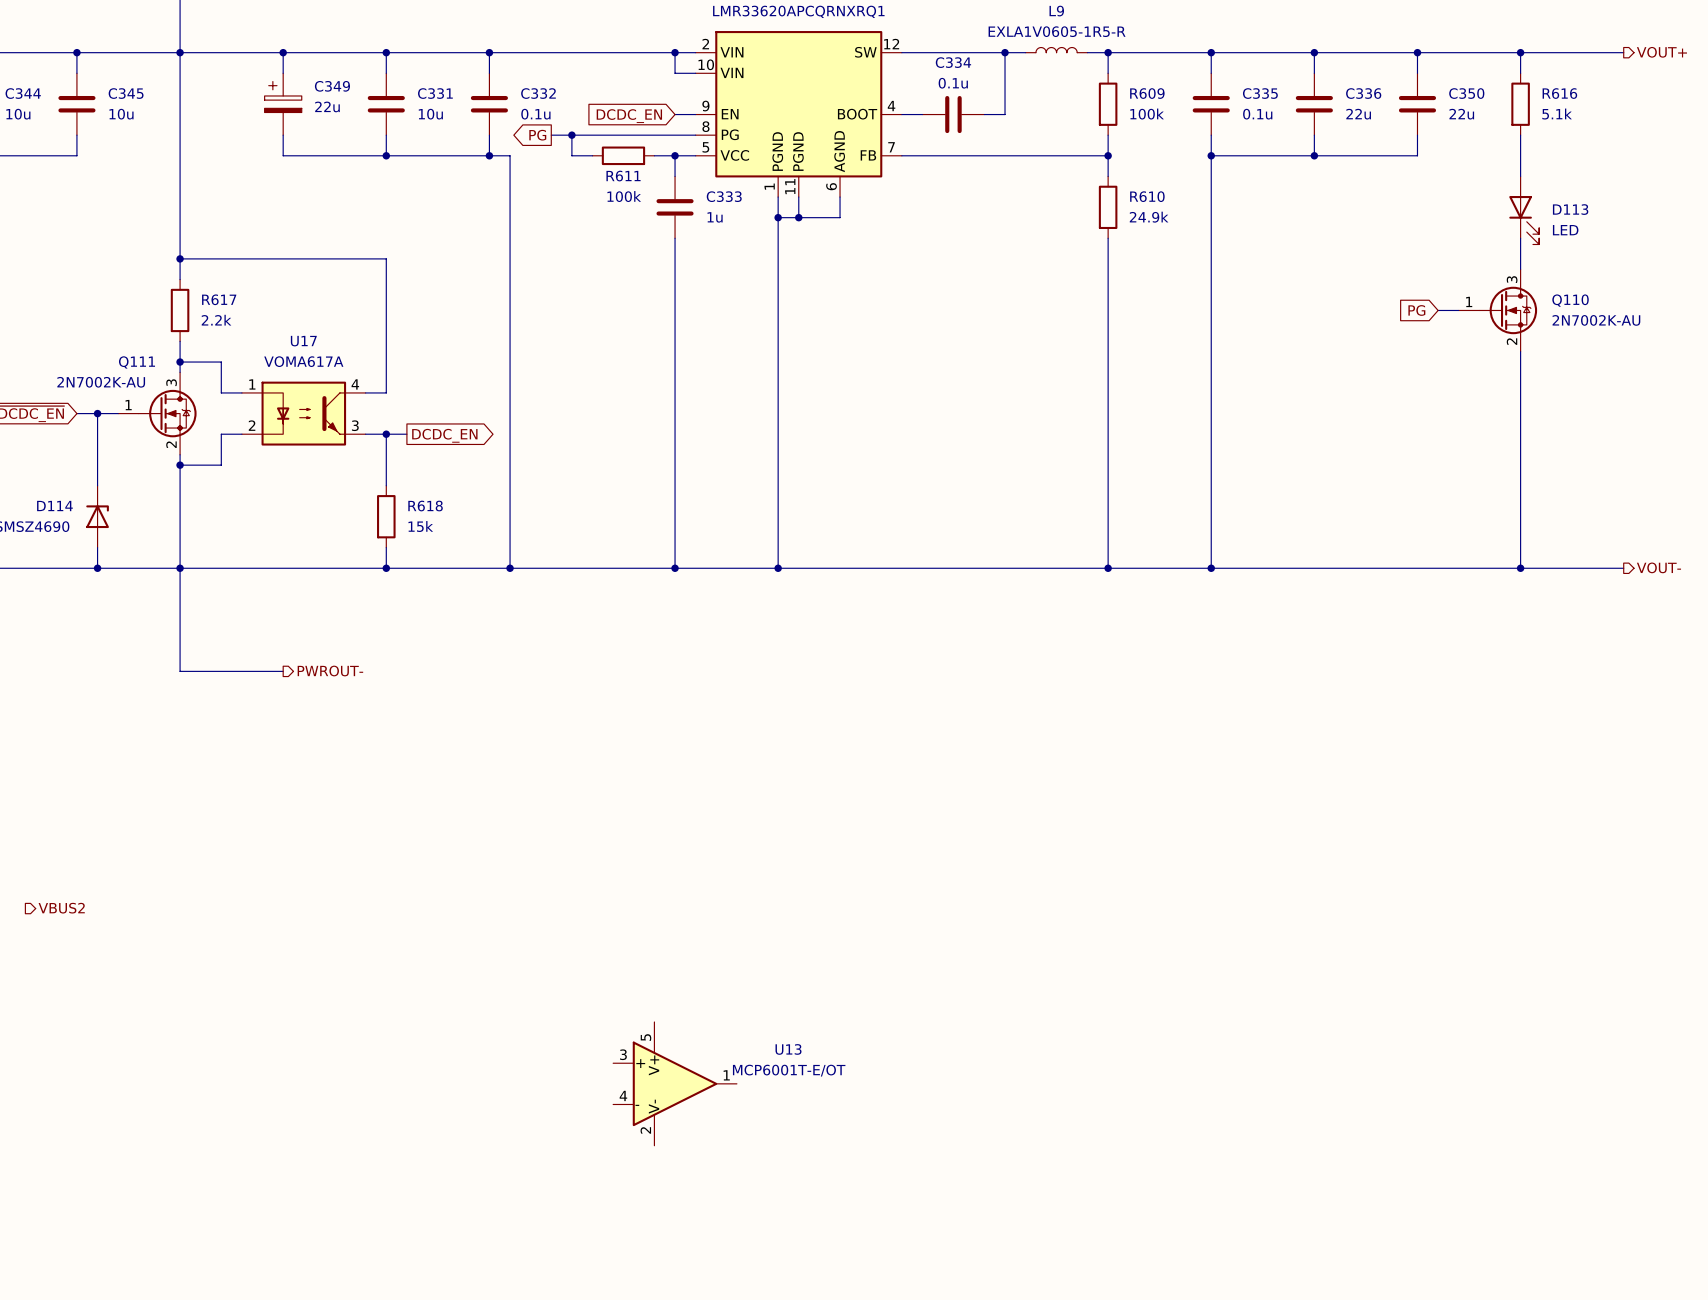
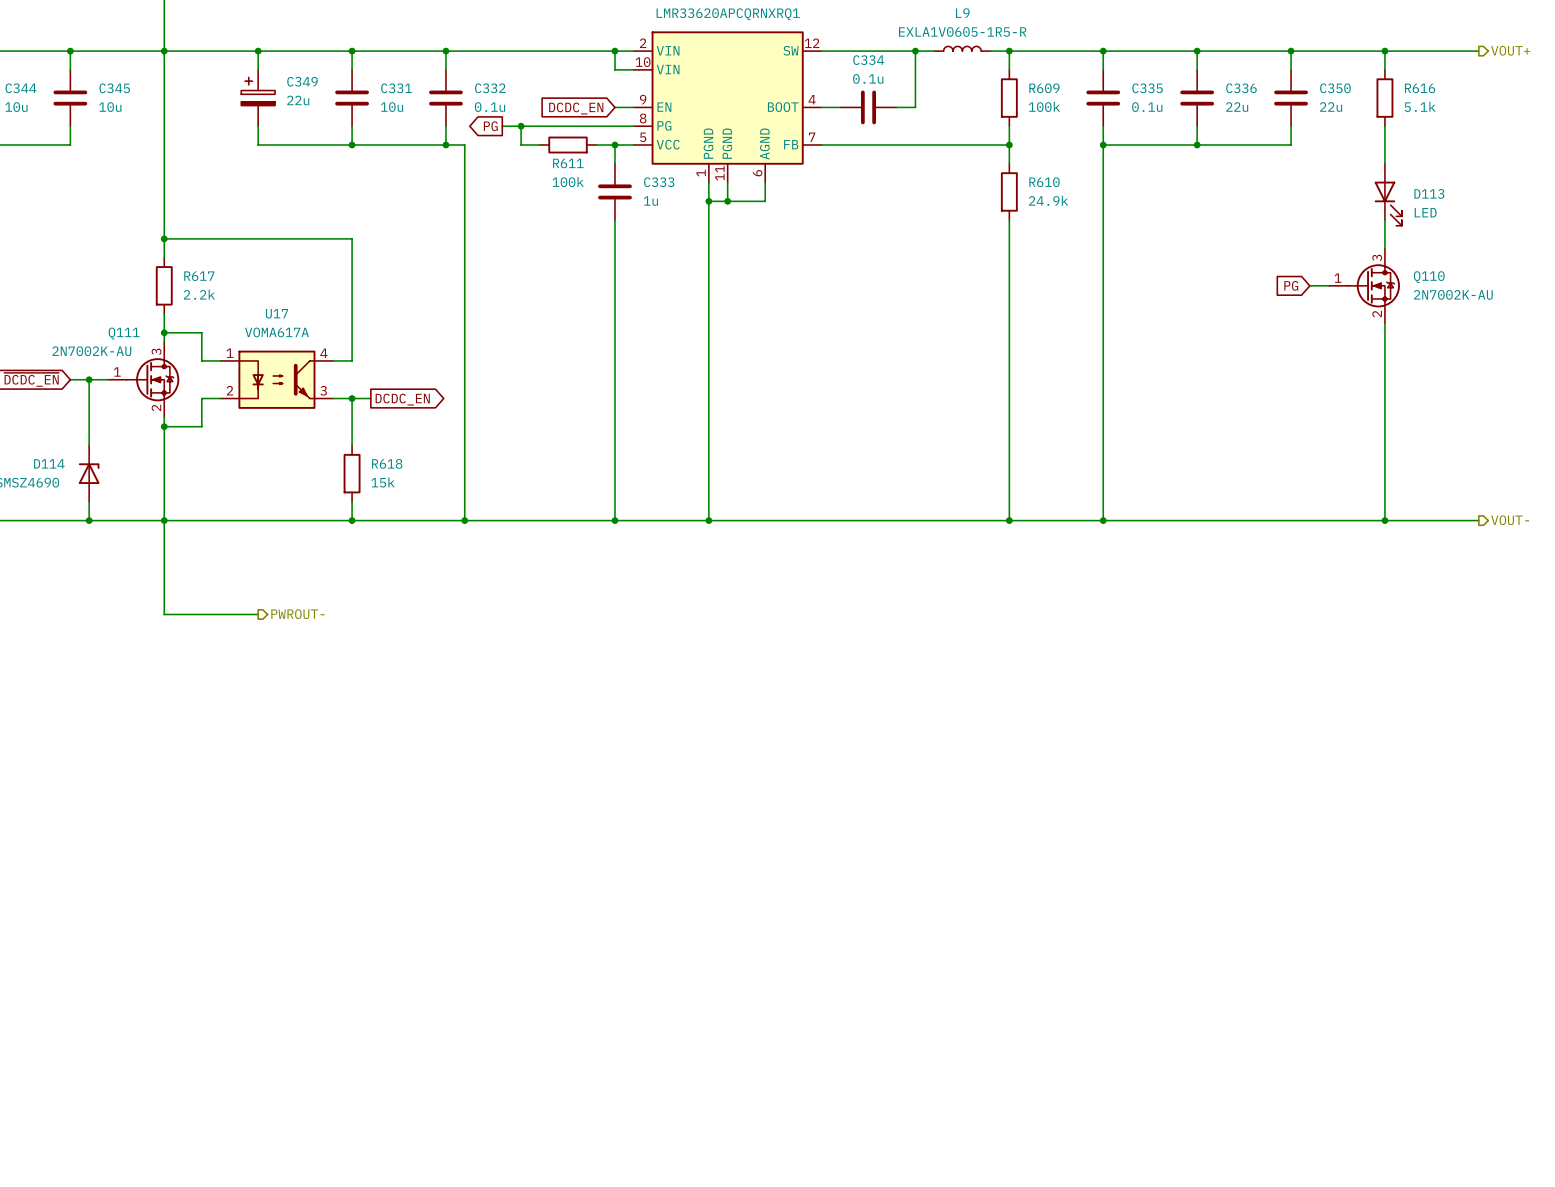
hierarchical label: VBUS2 (61, 908) -> none
U13: MCP6001T-E/OT (675, 1083) -> none

